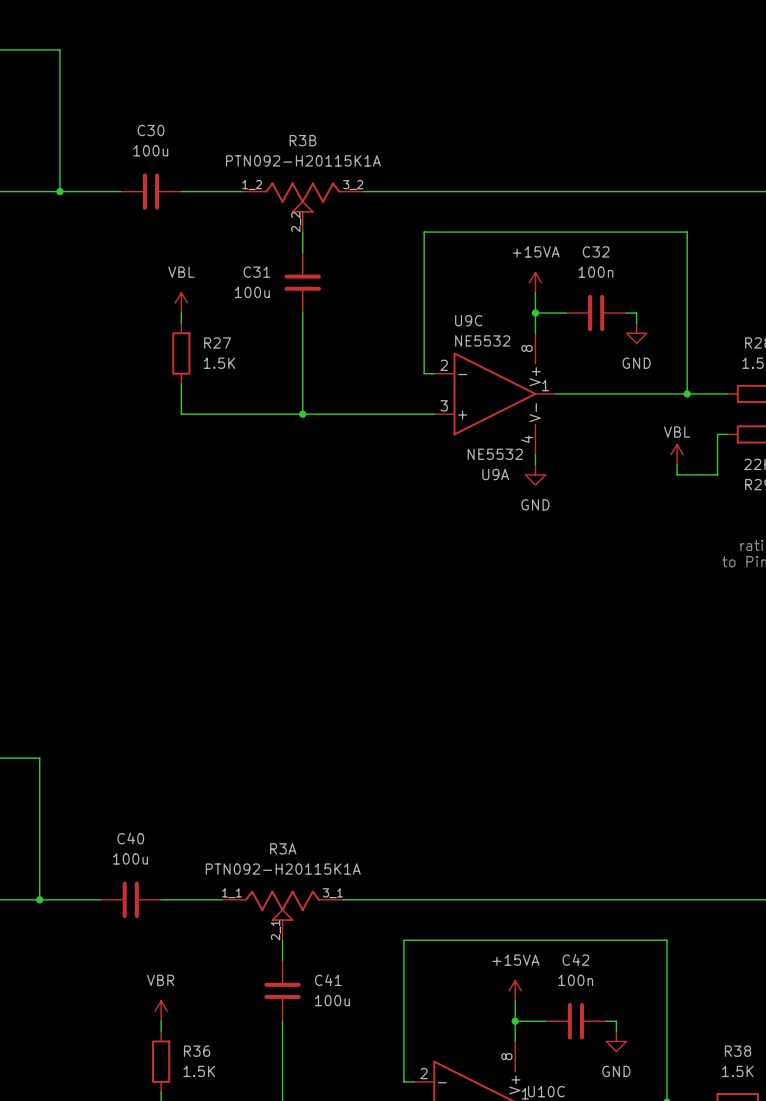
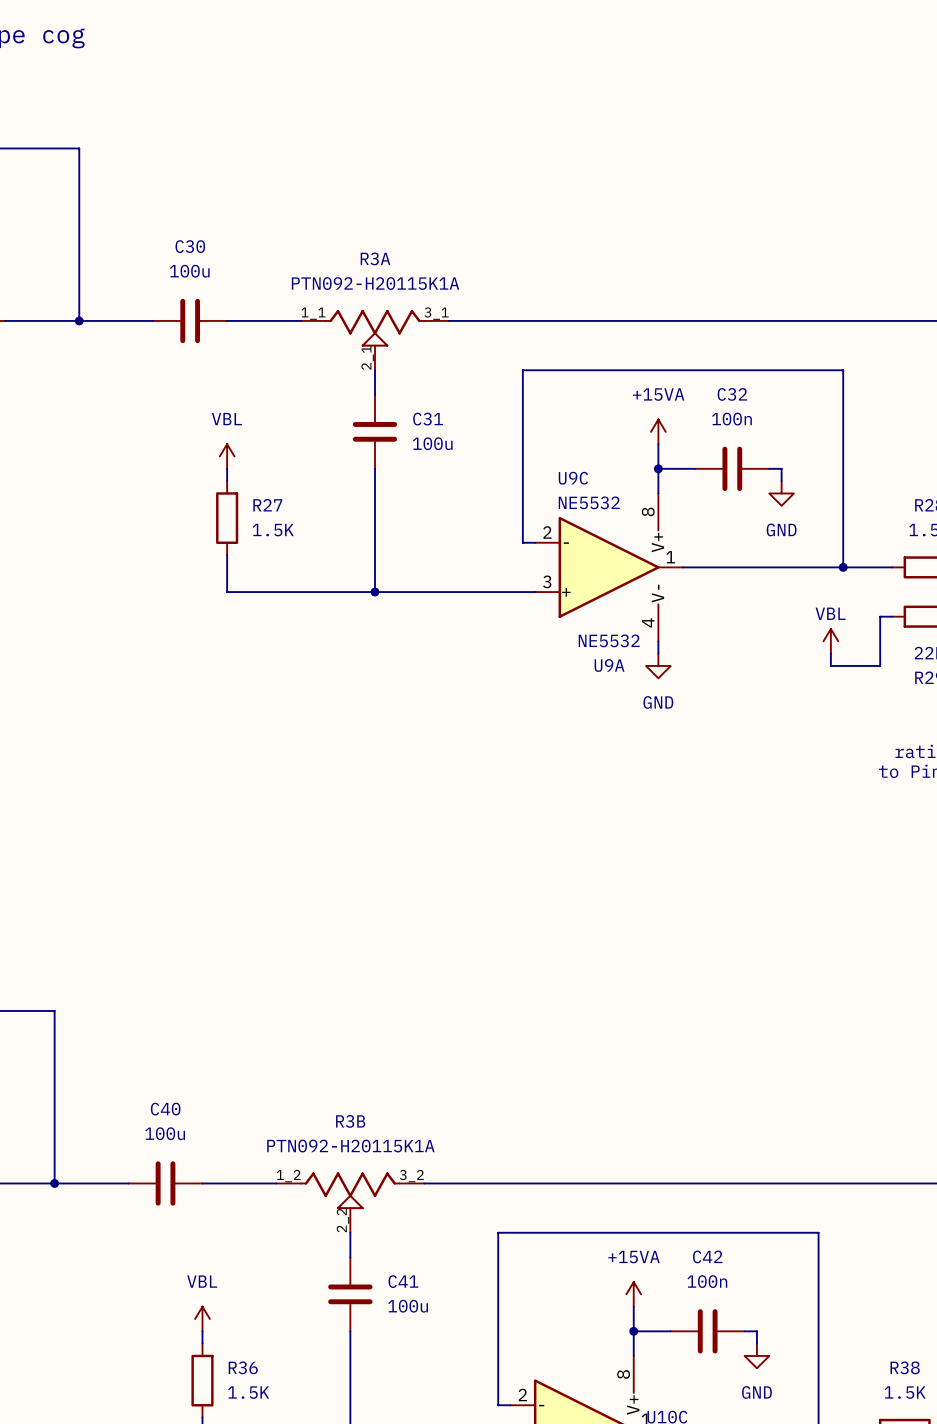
R3B position: (302, 207) -> (350, 1202)
C31 name position: C31 (256, 272) -> C31 (428, 419)
C31 value position: 100u (252, 292) -> 100u (432, 443)
R3A position: (282, 915) -> (374, 340)
power symbol: VBR (161, 1011) -> VBL (202, 1319)

